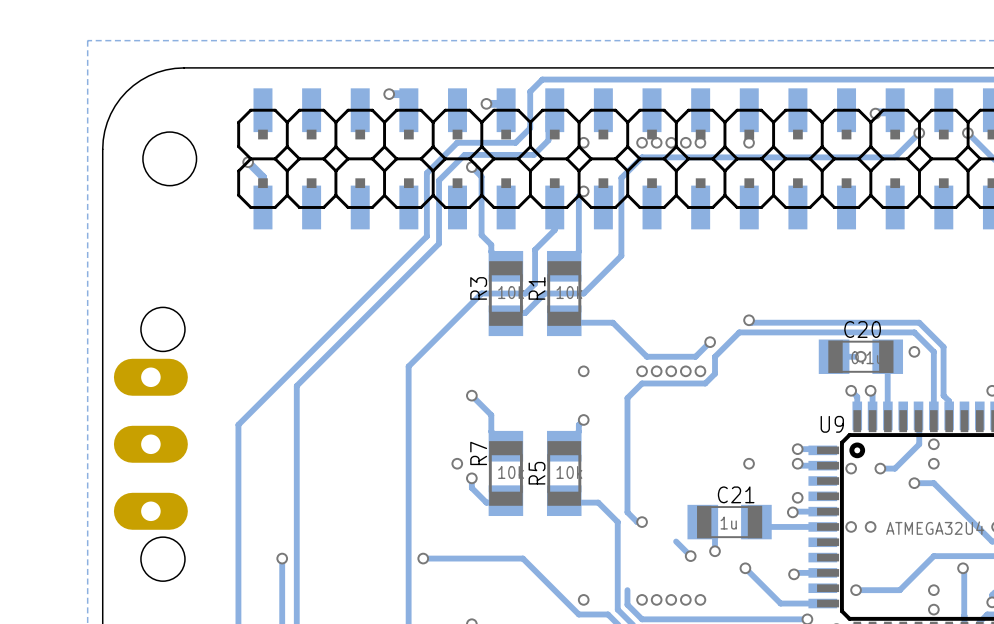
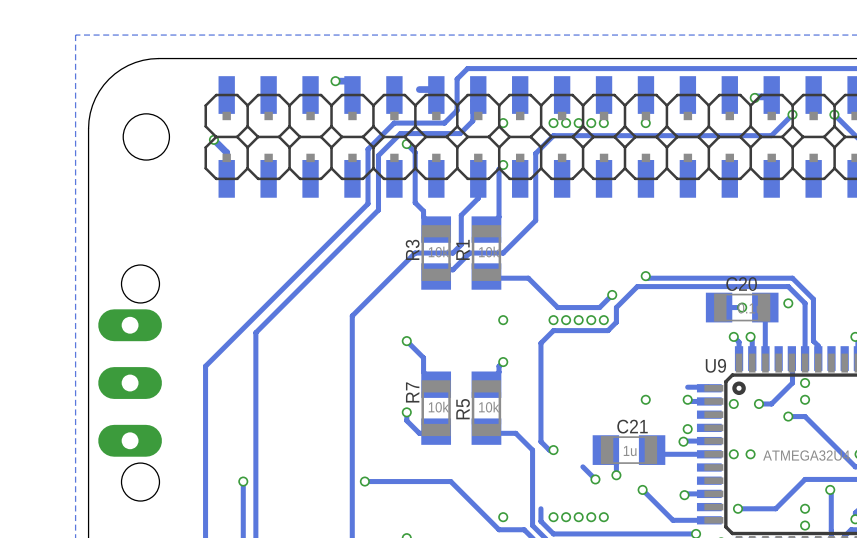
via: (486, 103) -> none
via: (797, 449) -> none
via: (457, 463) -> none

